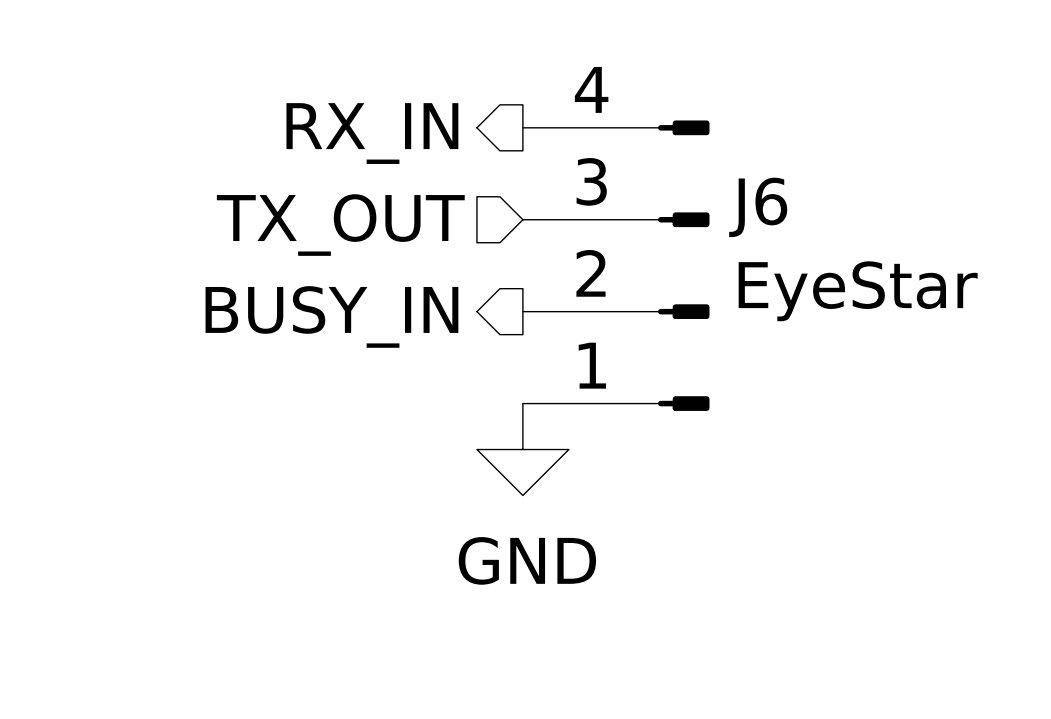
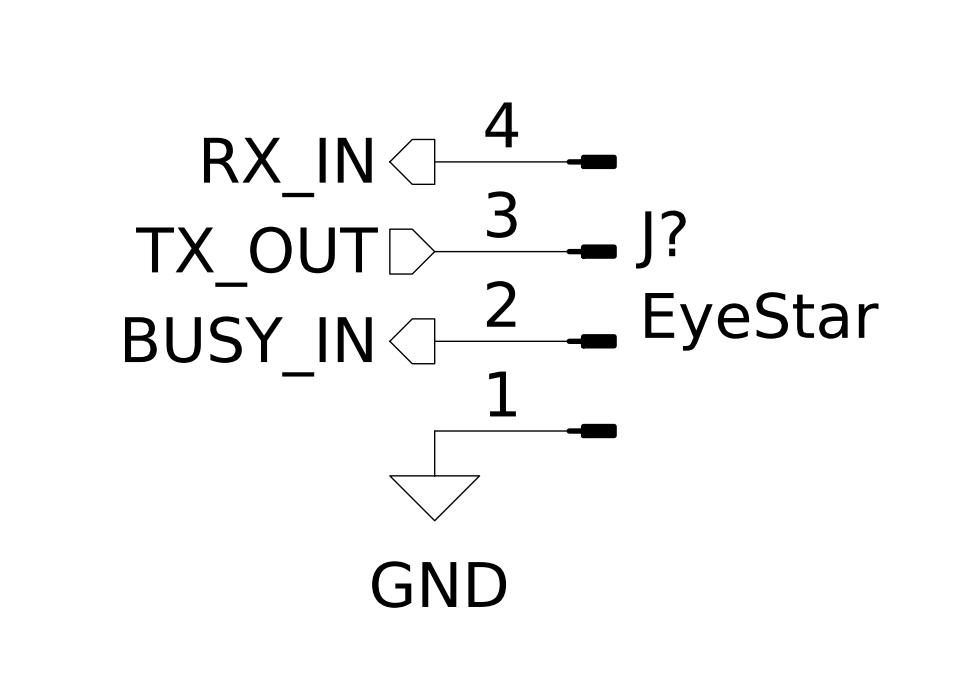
J6 name: J6 (758, 207) -> J? (660, 239)

